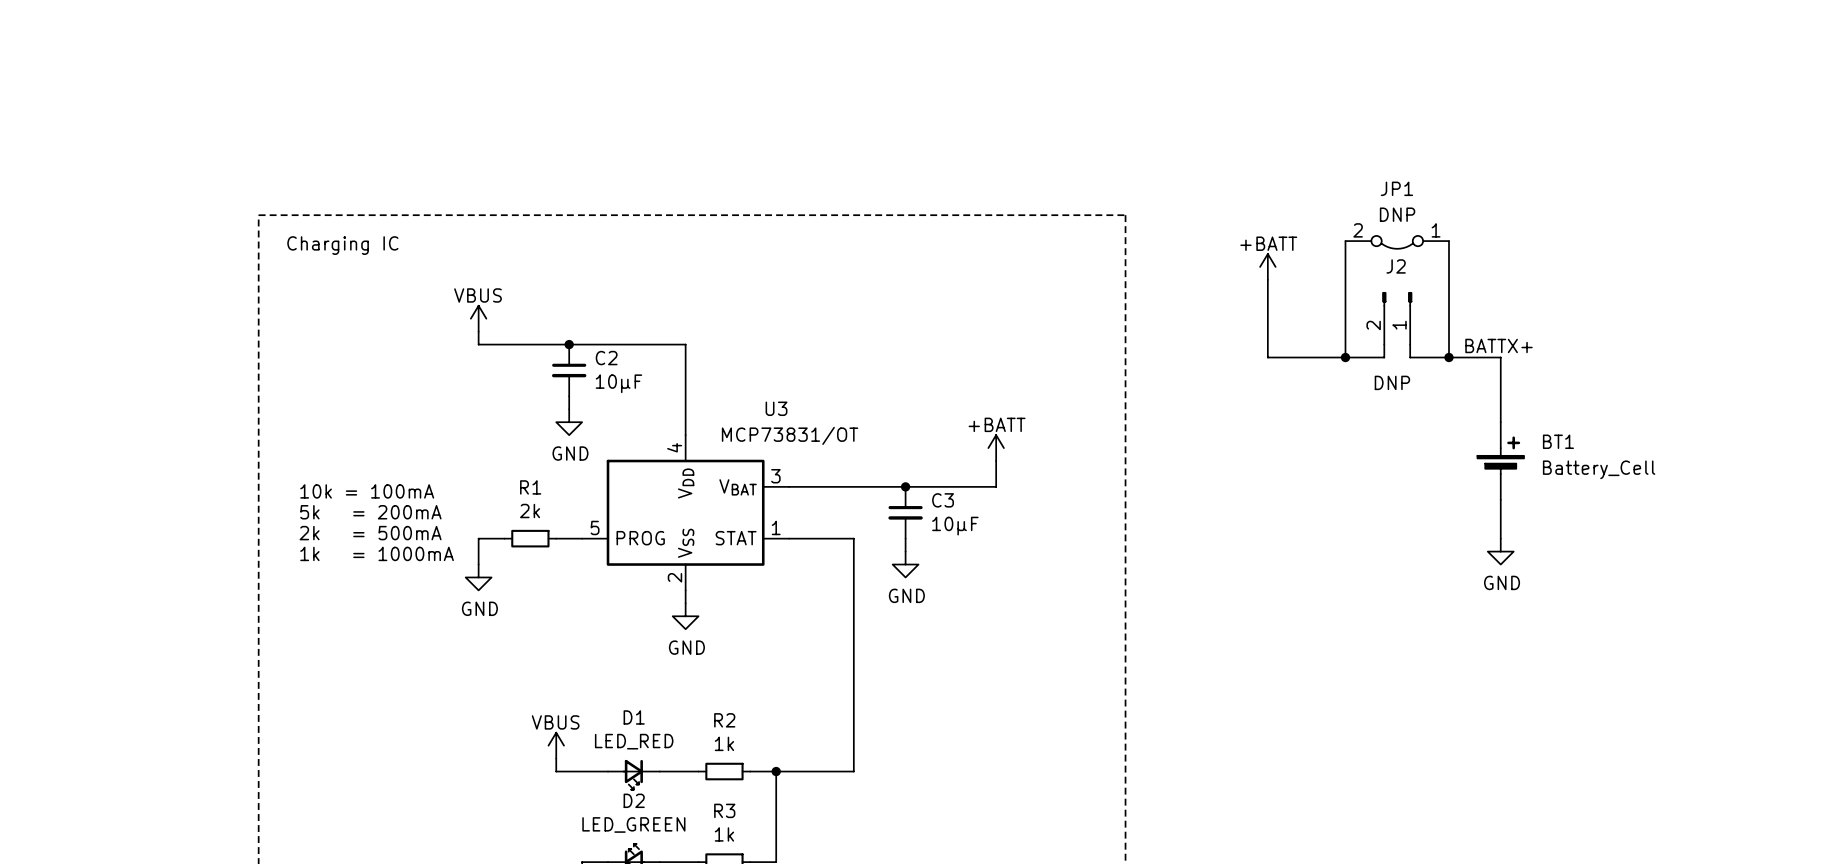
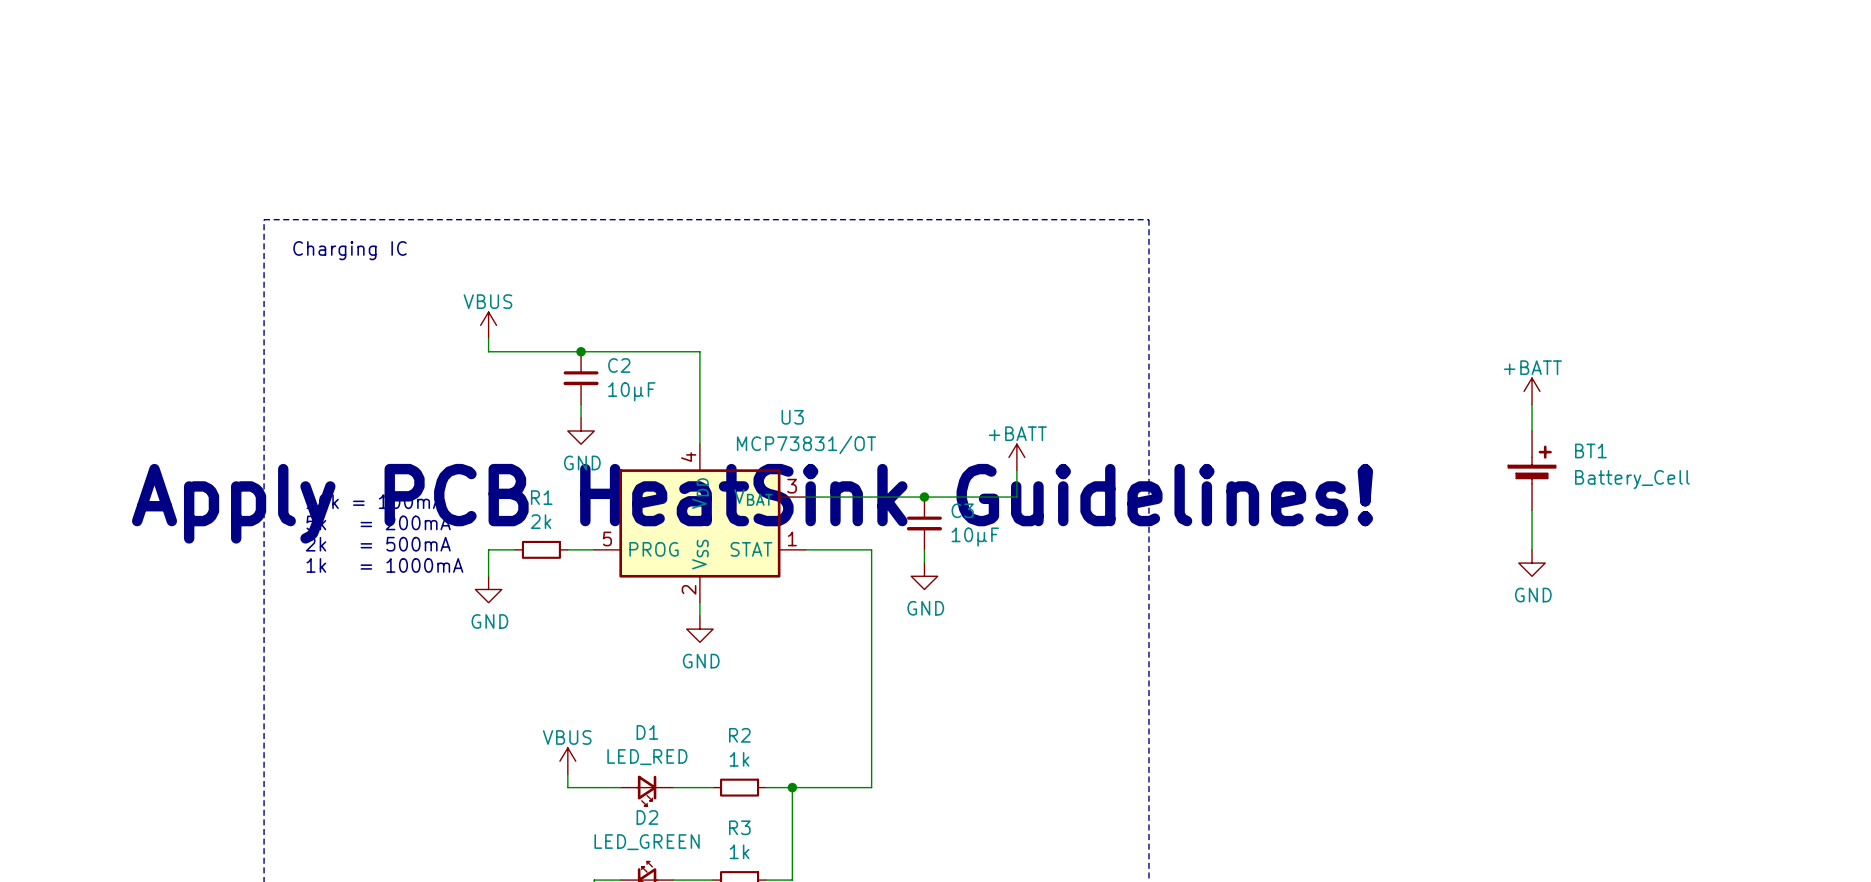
wire: (1345, 241) (1345, 357) -> none
wire: (1448, 241) (1448, 357) -> none
JP1: DNP (1397, 242) -> none
power symbol: +BATT (1267, 266) -> none
wire: (1267, 279) (1267, 357) (1384, 357) (1384, 344) -> none
J2: DNP (1397, 318) -> none
wire: (1410, 344) (1410, 357) (1500, 357) (1500, 396) -> none
label: BATTX+ (1498, 345) -> none
junction: (1345, 357) -> none
junction: (1448, 357) -> none
power symbol: none -> +BATT (1532, 391)
text: none -> Apply PCB HeatSink Guidelines! (752, 503)

